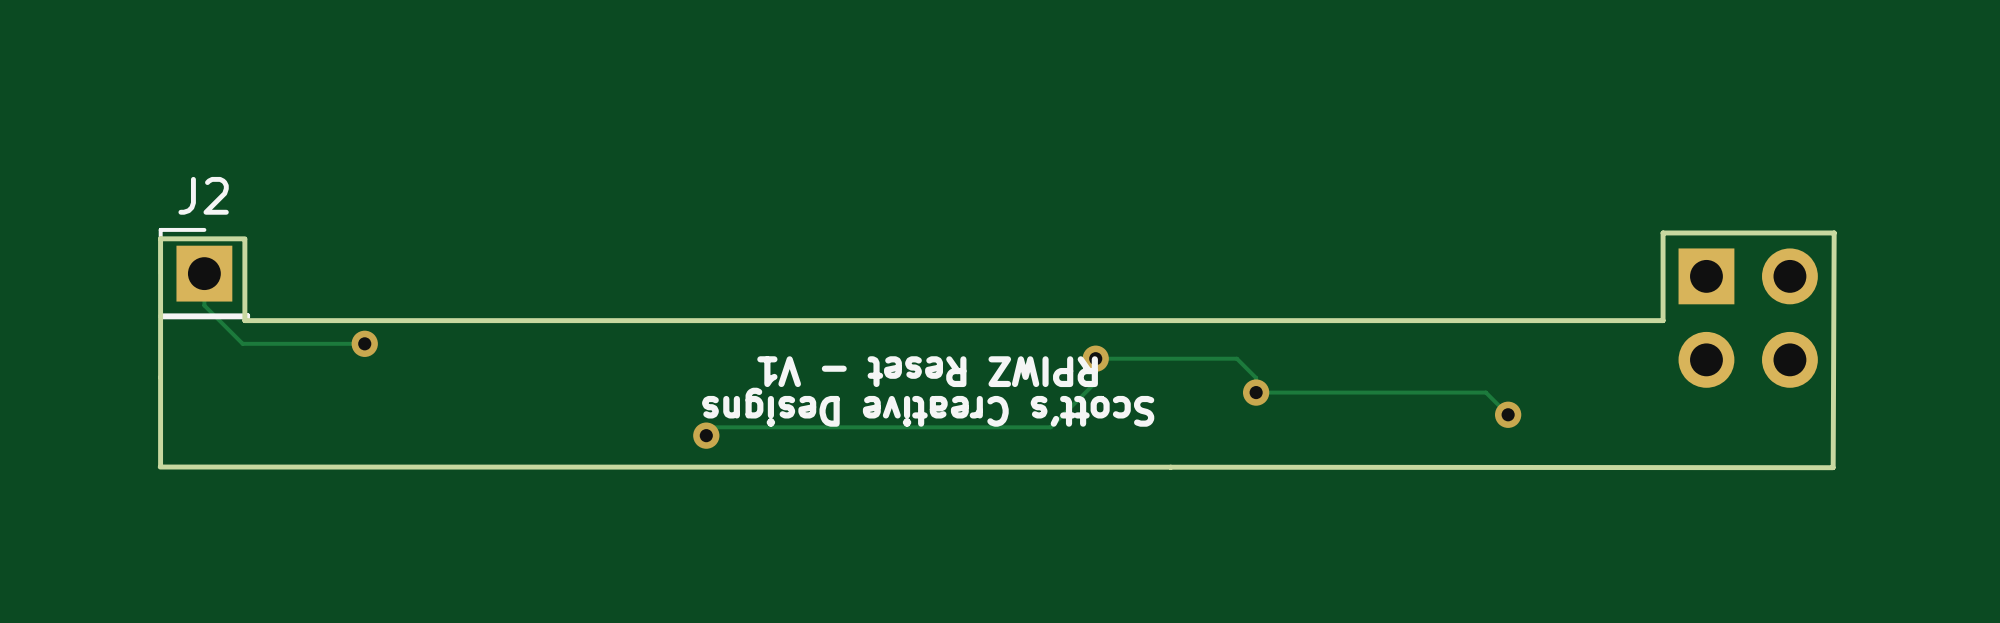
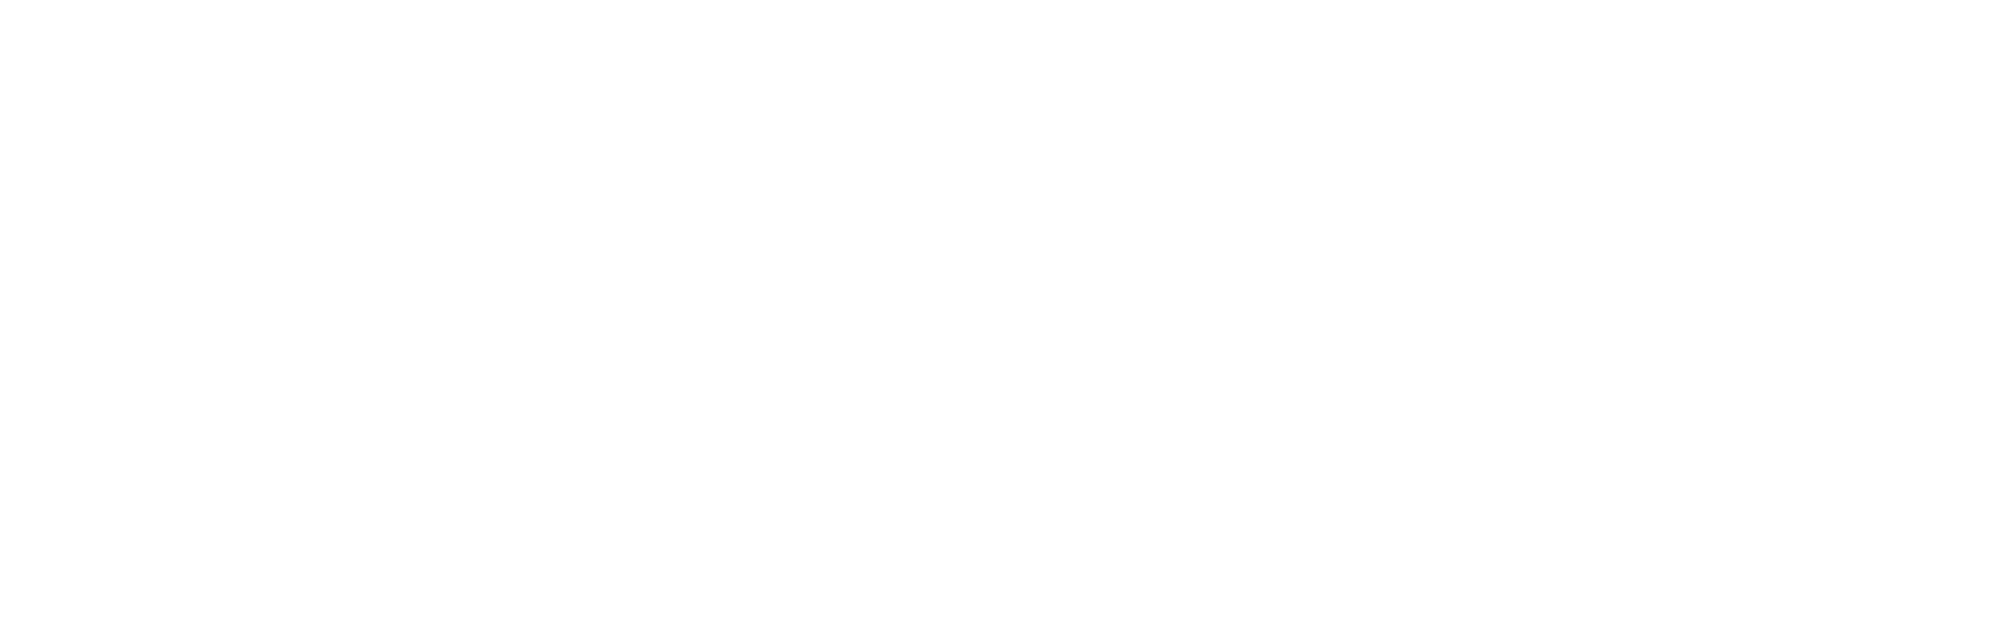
board edge: (244, 238) (160, 238) (160, 466) -> none
board edge: (244, 239) (244, 320) (1663, 320) (1663, 232) (1834, 232) (1833, 467) (1170, 467) -> none
track: (204, 273) (204, 305) (242, 343) (364, 343) -> none
J2: (204, 273) -> none
part: (1748, 318) -> none
via: (364, 343) -> none
via: (1095, 358) -> none
text: RPIWZ Reset - V1 (927, 371) -> none
via: (1256, 392) -> none
text: Scott's Creative Designs (928, 407) -> none
track: (1504, 411) (1485, 392) (1256, 392) (1256, 377) (1236, 358) (1095, 358) (1095, 382) (1050, 427) (702, 427) (702, 432) (706, 435) -> none
via: (1508, 414) -> none
via: (706, 435) -> none
board edge: (160, 467) (1170, 467) -> none

